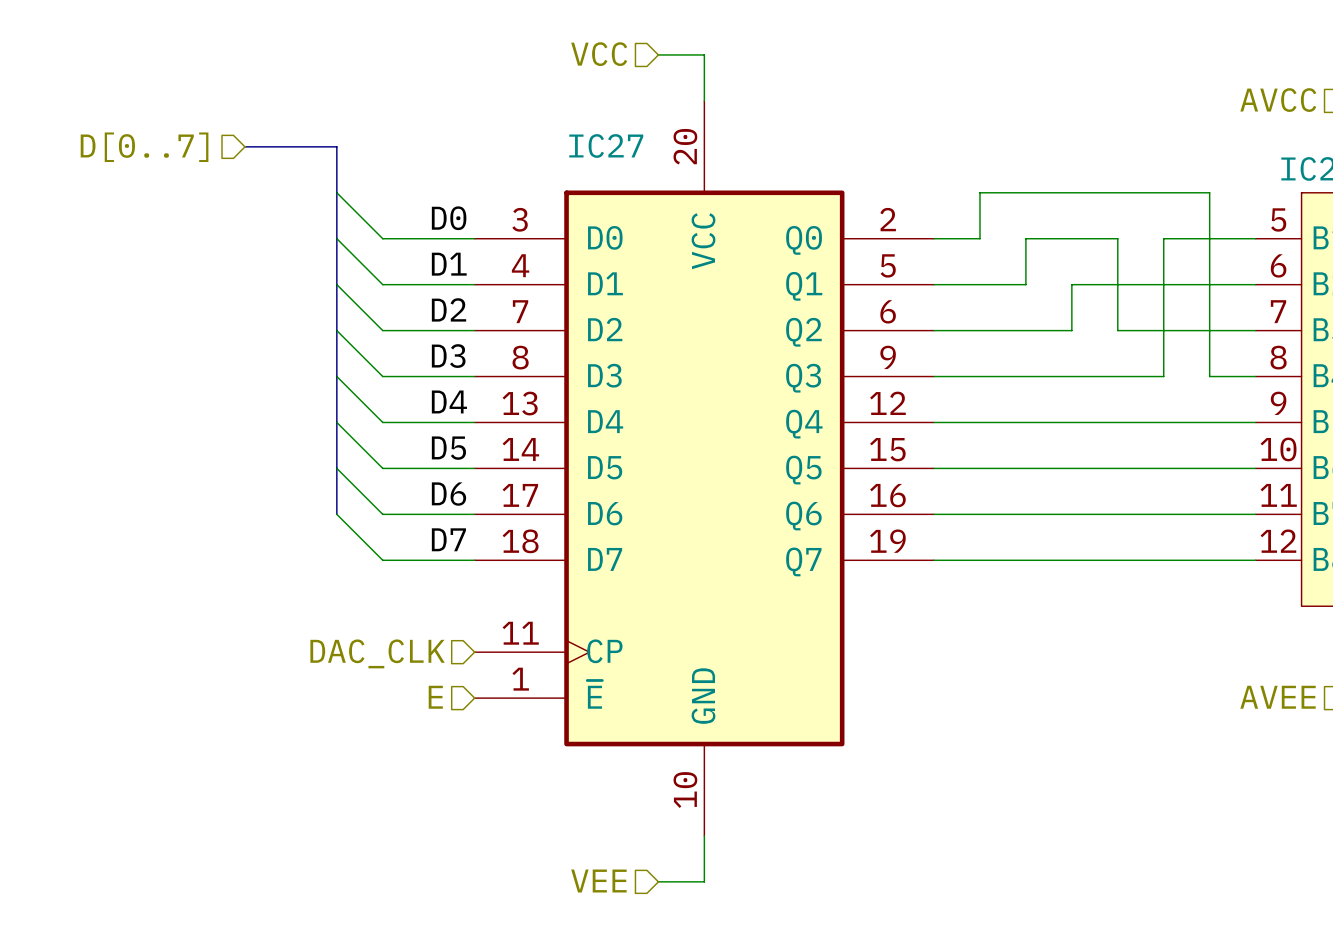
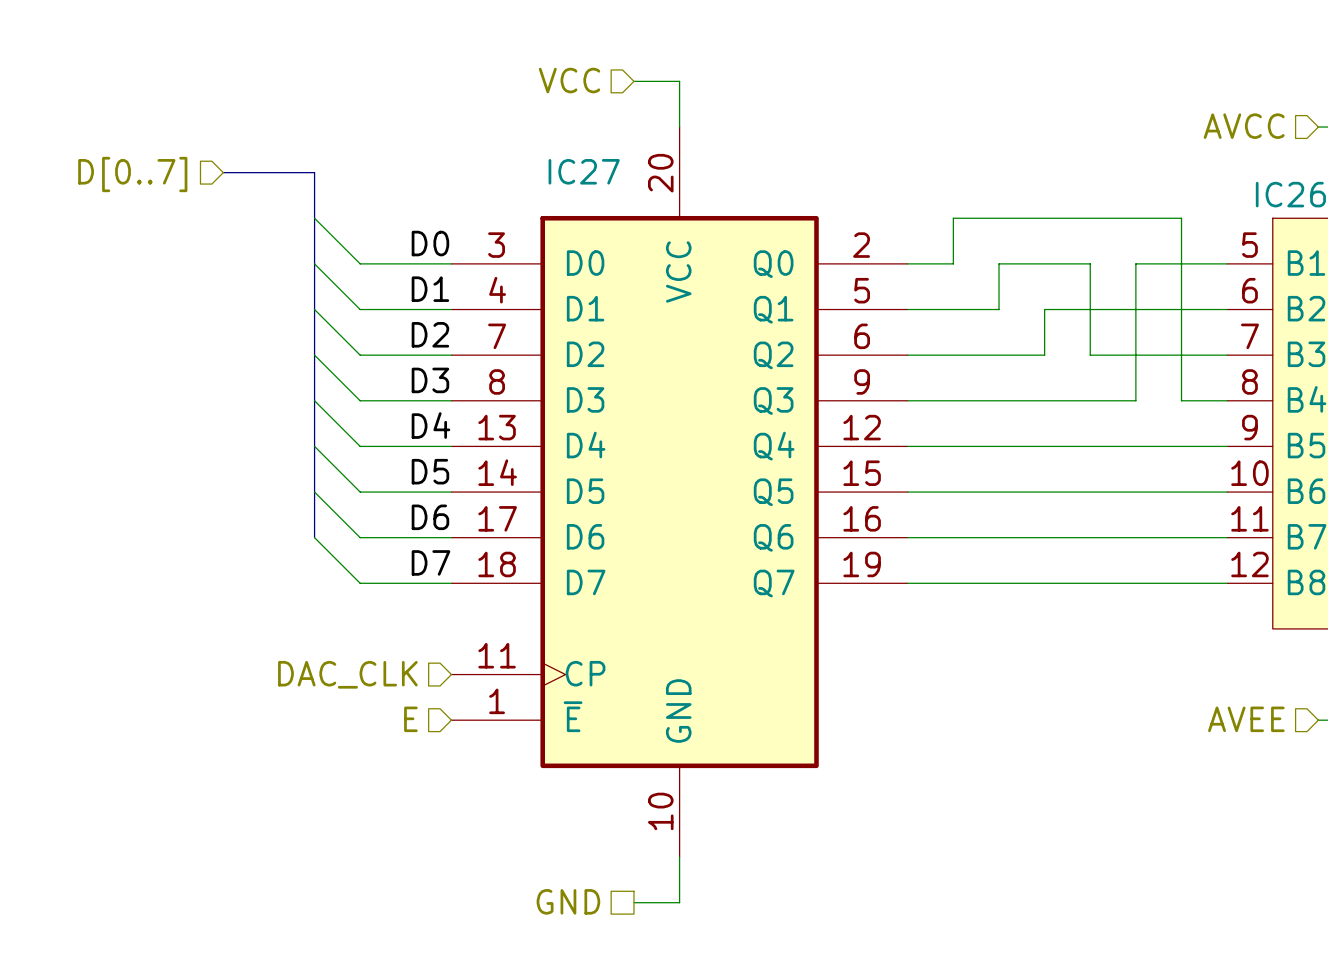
hierarchical label shape: input (598, 881) -> passive (568, 901)
hierarchical label: VEE (598, 881) -> GND (568, 901)

